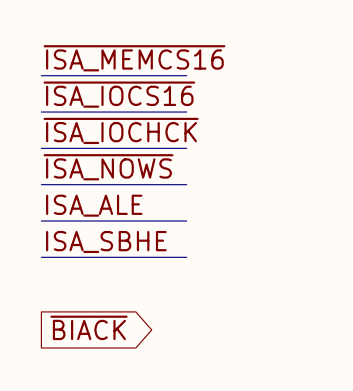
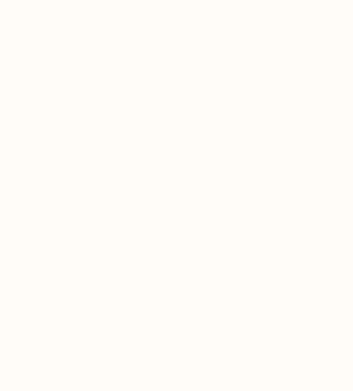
label: ~{ISA_MEMCS16} (134, 58) -> none
wire: (41, 75) (186, 75) -> none
label: ~{ISA_IOCS16} (119, 94) -> none
wire: (41, 112) (186, 112) -> none
label: ~{ISA_IOCHCK} (121, 130) -> none
wire: (41, 148) (186, 148) -> none
label: ~{ISA_NOWS} (108, 167) -> none
wire: (41, 184) (186, 184) -> none
label: ISA_ALE (94, 205) -> none
wire: (41, 221) (186, 221) -> none
label: ISA_SBHE (106, 241) -> none
wire: (41, 257) (186, 257) -> none
global label: ~{BIACK} (88, 327) -> none

